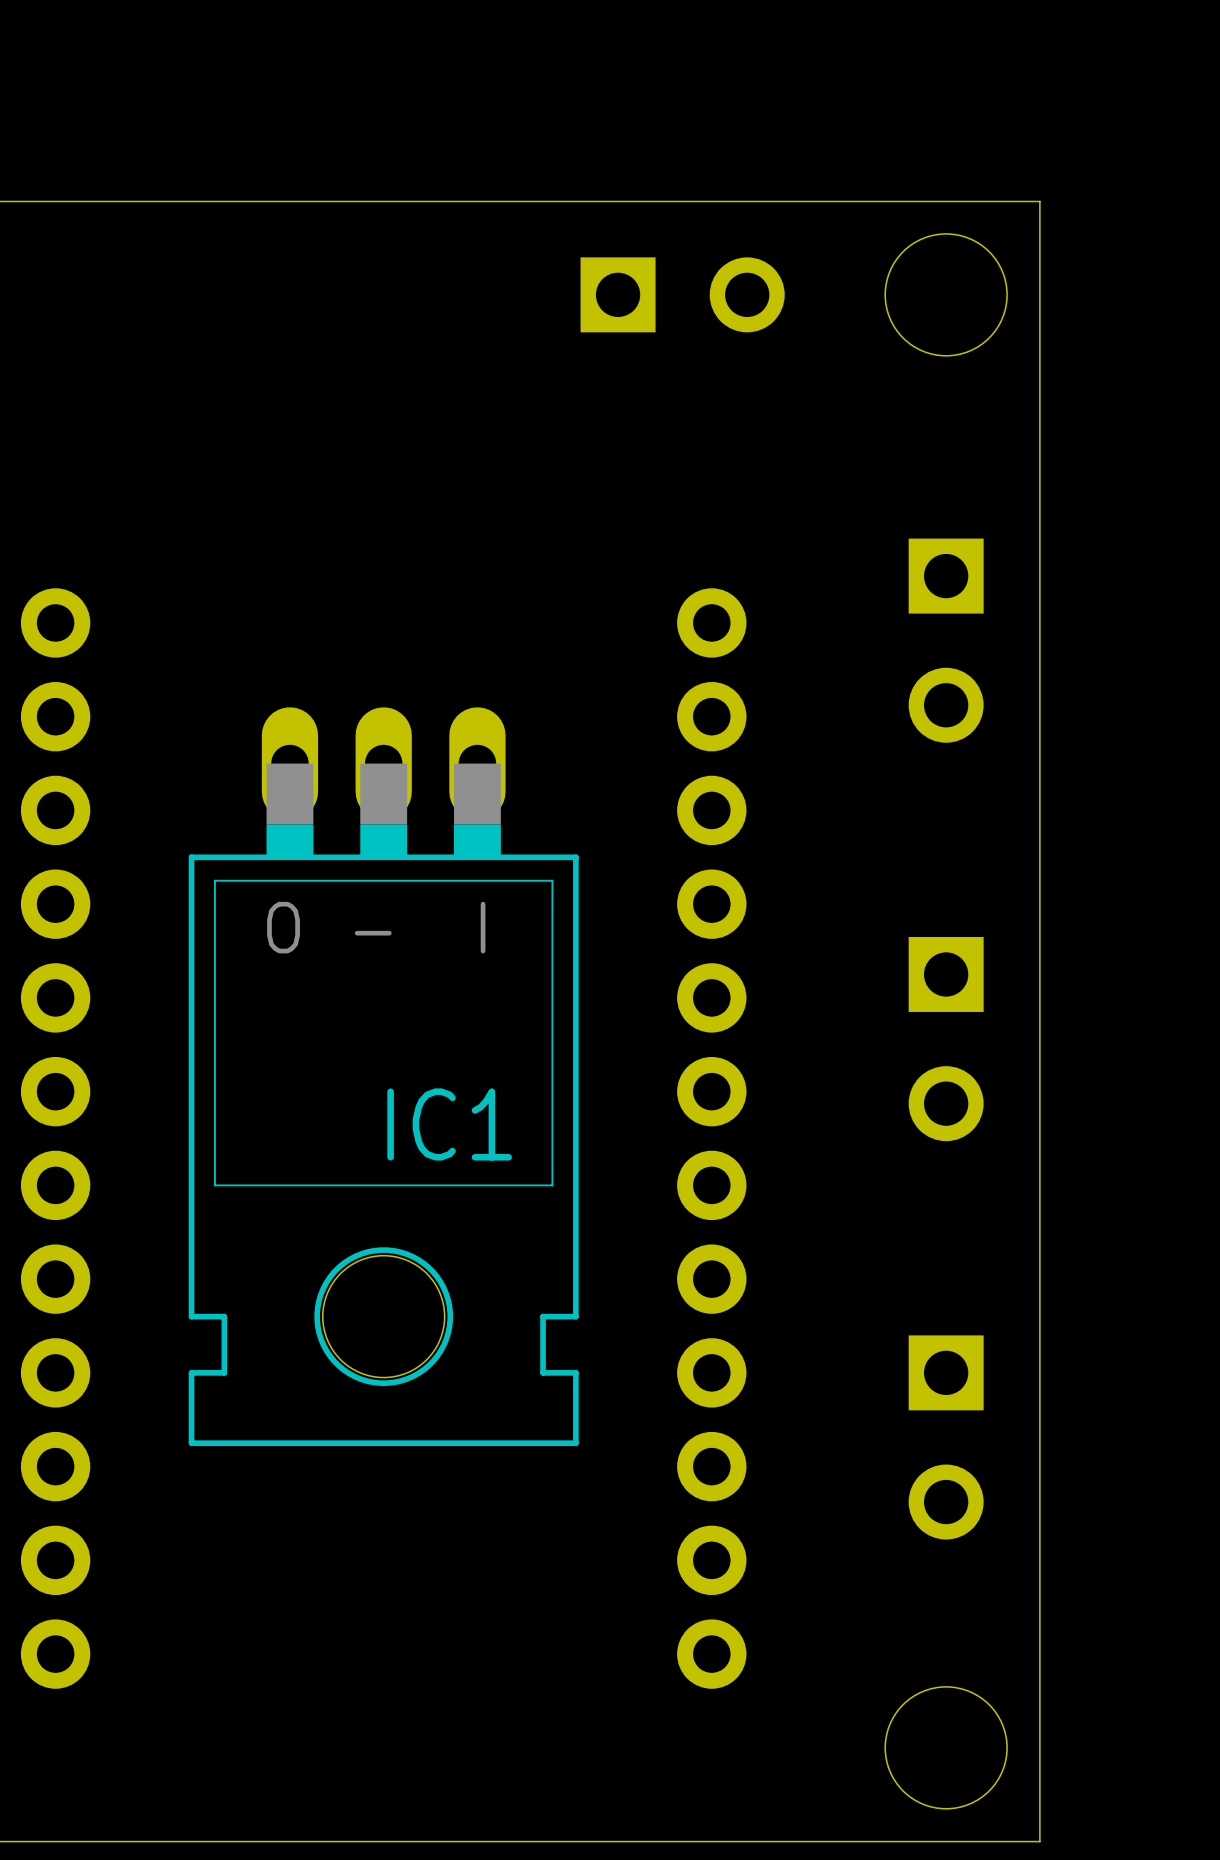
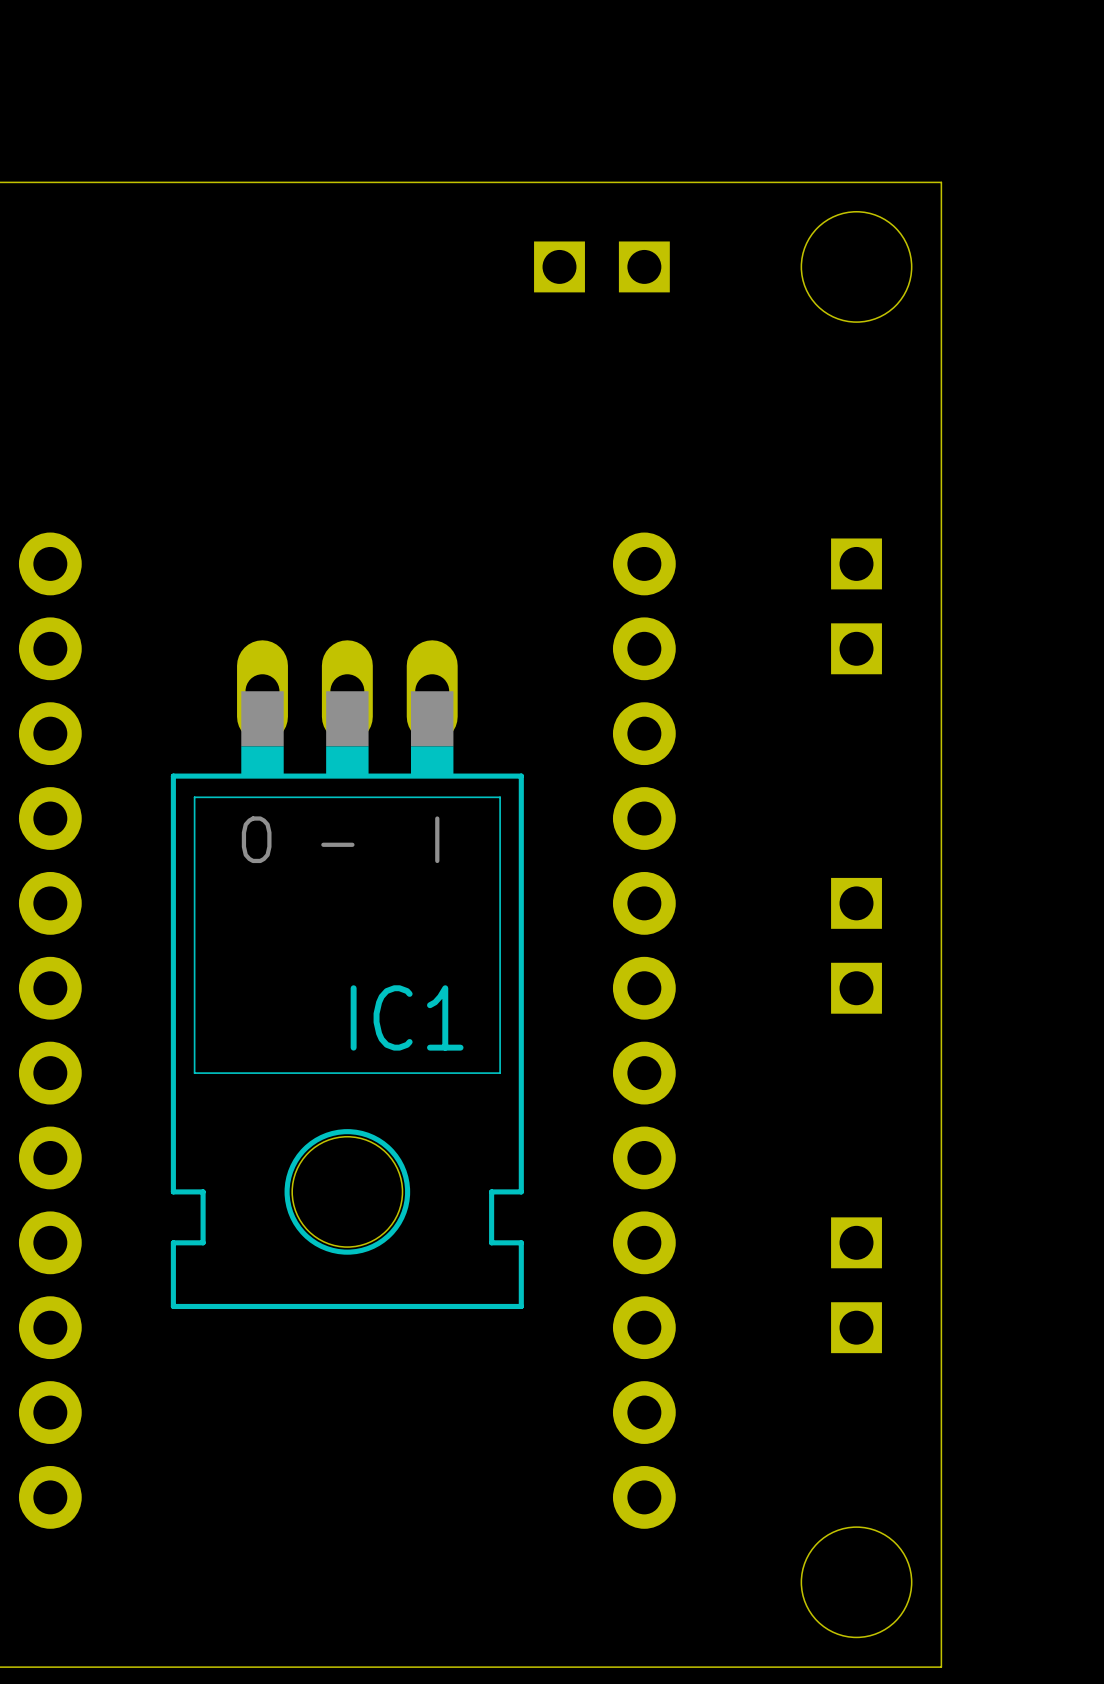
part footprint: [580, 257, 785, 333] -> [534, 241, 670, 293]
part footprint: [908, 538, 984, 743] -> [831, 538, 882, 675]
part footprint: [908, 936, 984, 1142] -> [831, 877, 882, 1014]
part footprint: [908, 1335, 984, 1540] -> [831, 1217, 882, 1354]

